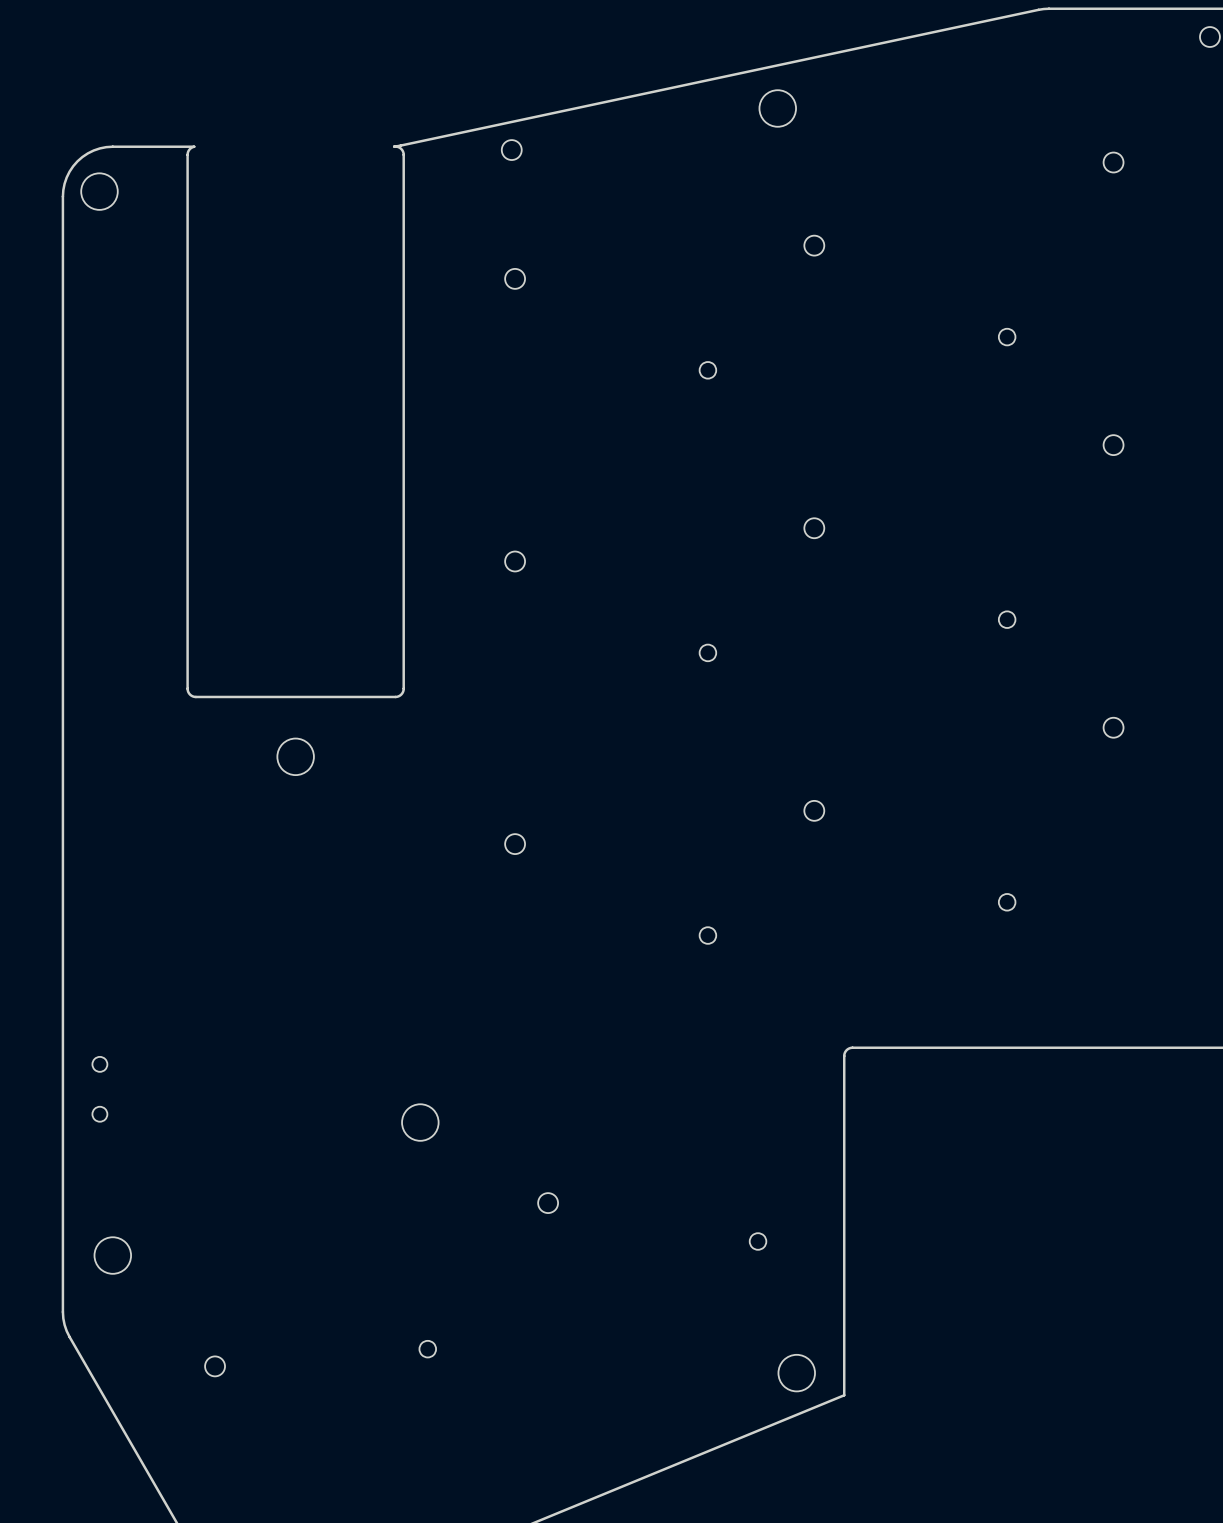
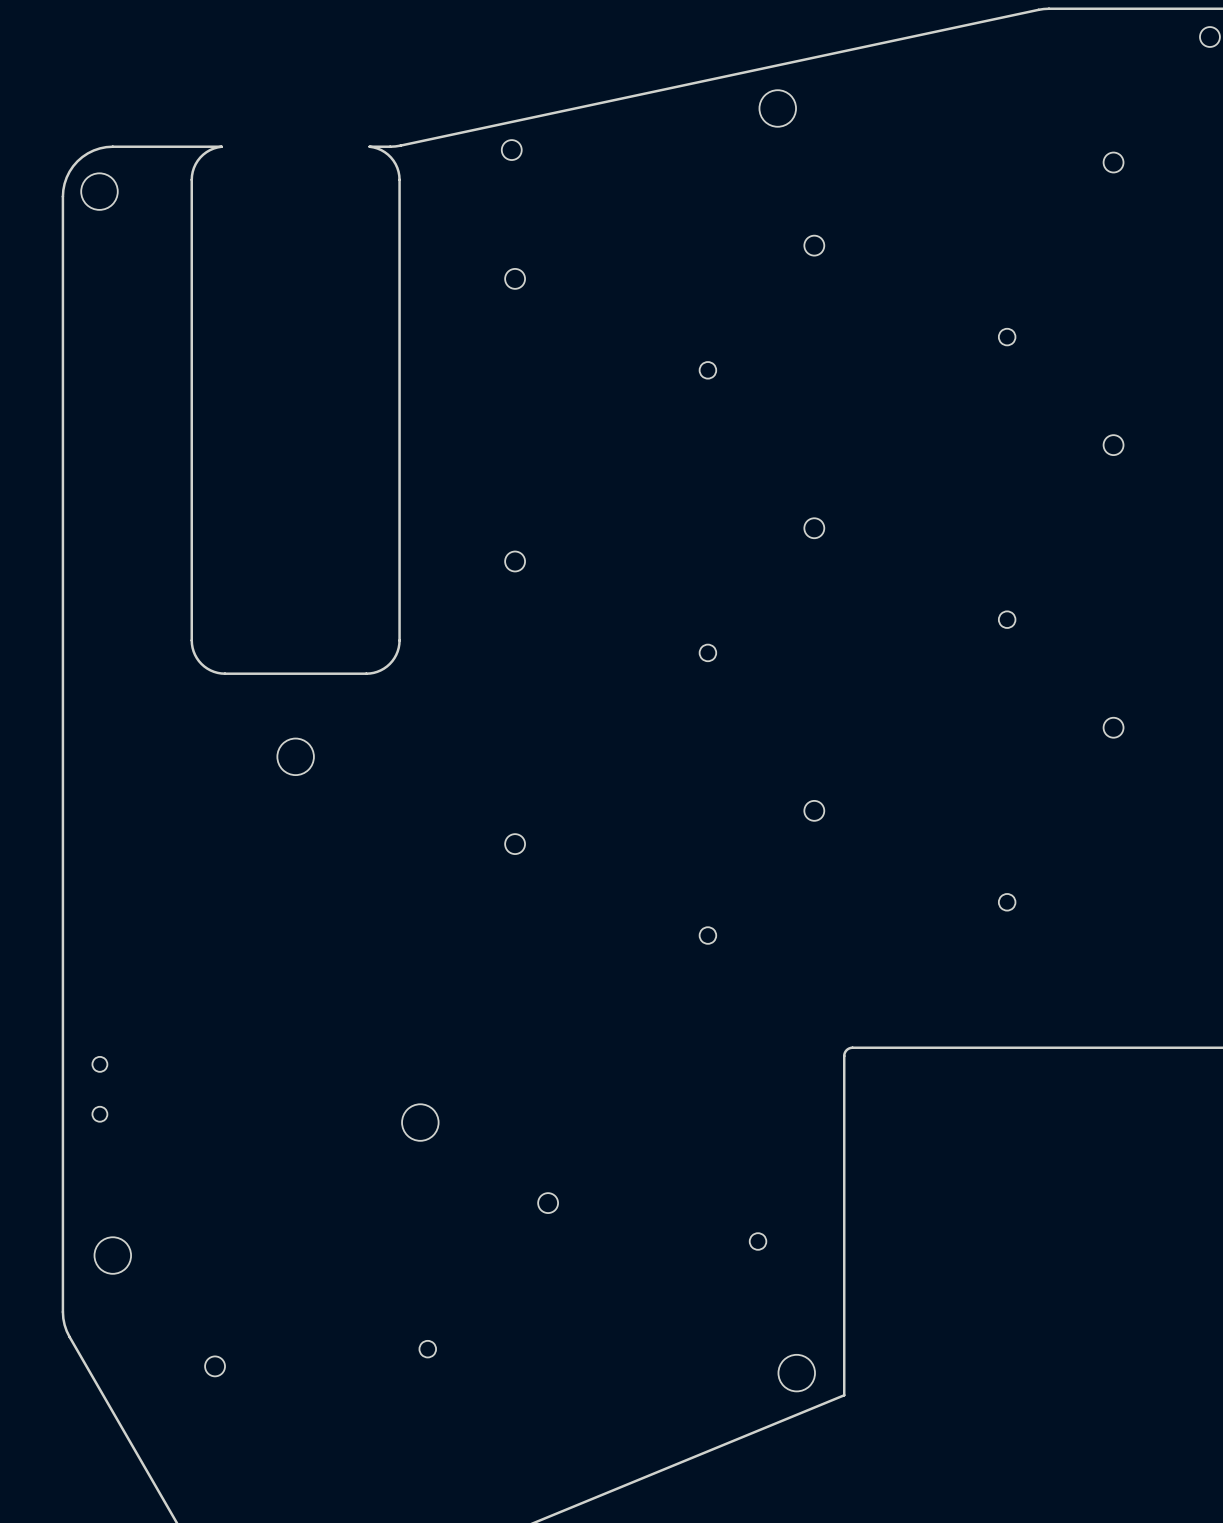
board edge: (400, 145) (394, 146) (400, 148) (403, 154) (403, 688) (401, 694) (395, 696) (195, 696) (190, 695) (188, 691) (187, 154) (189, 149) (194, 146) -> (400, 145) (369, 146) (381, 150) (390, 157) (397, 167) (399, 179) (399, 644) (396, 654) (389, 663) (377, 671) (366, 673) (221, 673) (204, 666) (193, 651) (191, 640) (191, 179) (193, 167) (200, 157) (210, 150) (221, 146) (194, 146)

